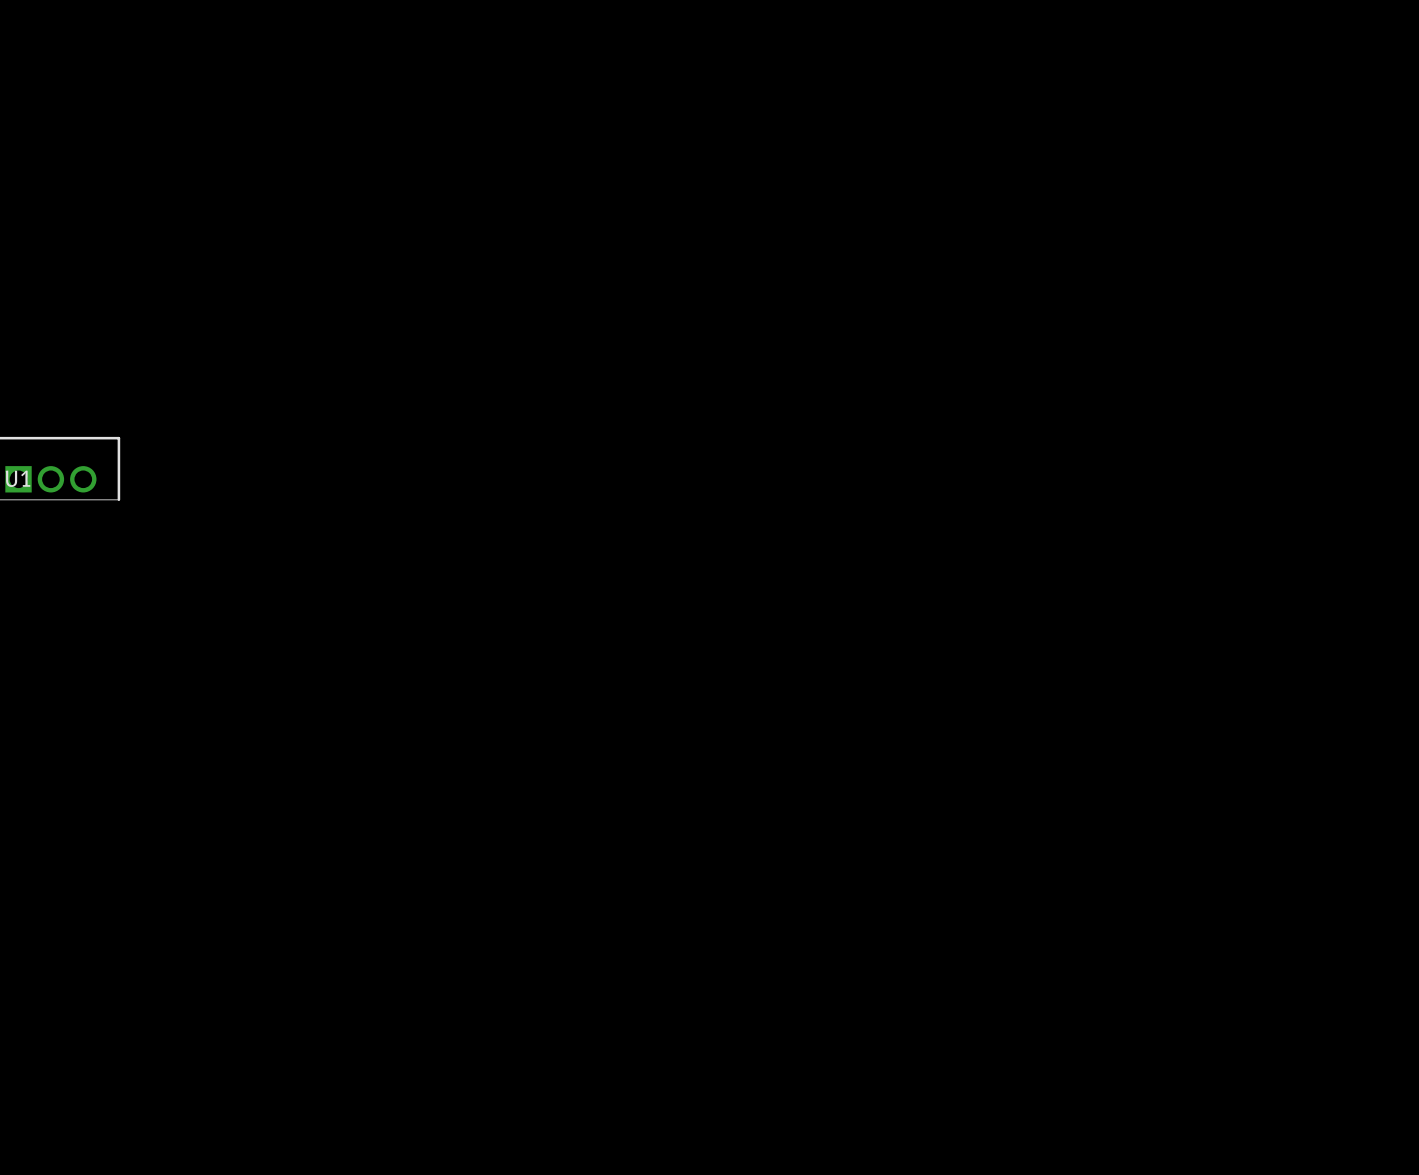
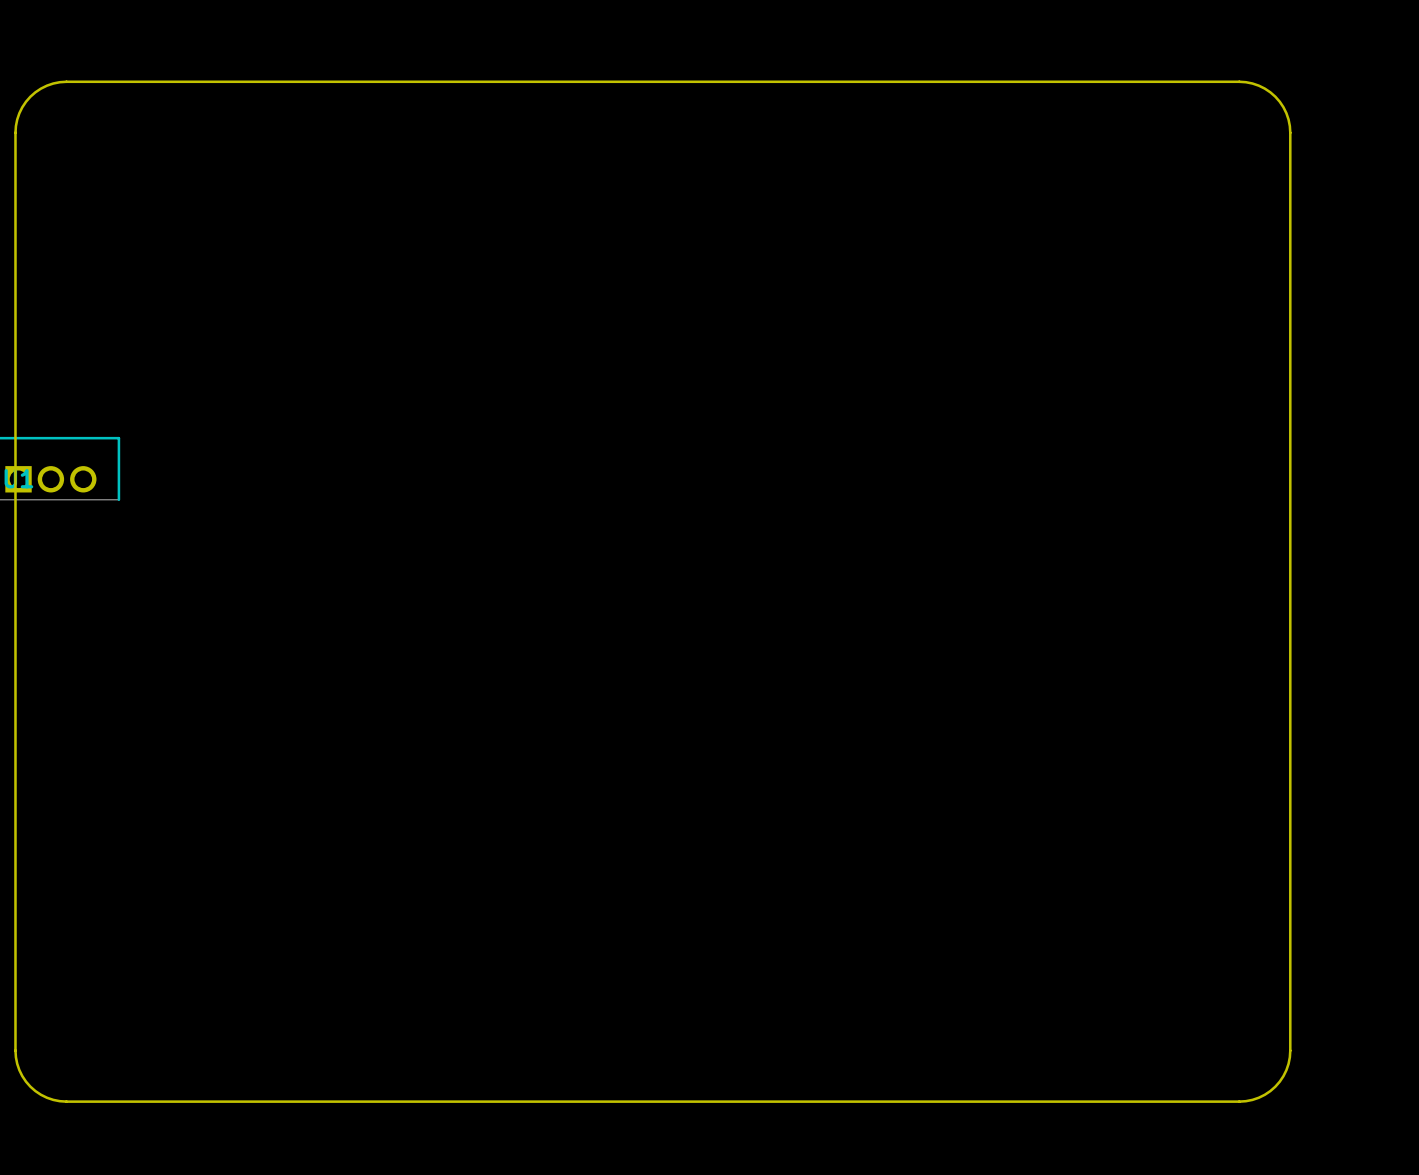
board edge: none -> (66, 81) (1239, 81) (1252, 83) (1270, 92) (1283, 107) (1288, 119) (1290, 132) (1290, 1050) (1286, 1070) (1279, 1081) (1270, 1091) (1258, 1097) (1239, 1101) (66, 1101) (53, 1099) (35, 1091) (22, 1076) (17, 1063) (15, 1050) (15, 132) (19, 113) (30, 96) (46, 85) (66, 81)

